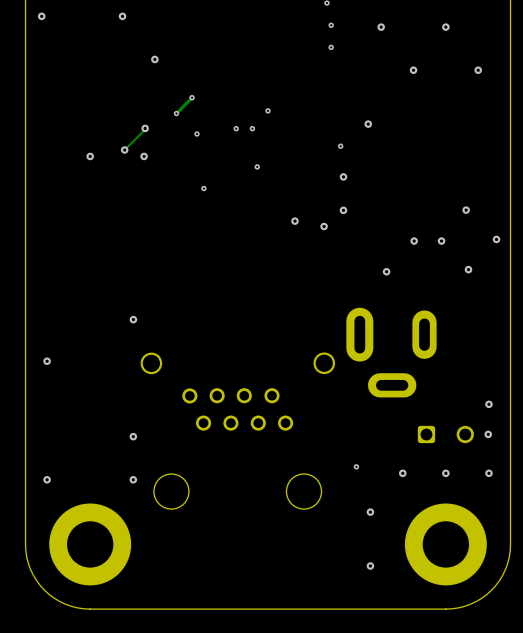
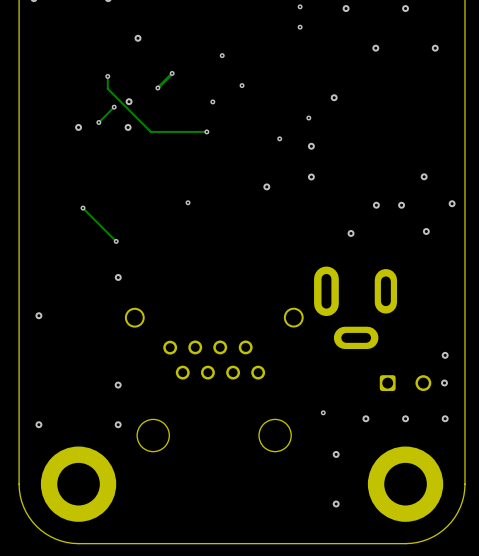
via: none -> (222, 55)
track: none -> (107, 76) (107, 88) (150, 131) (206, 131)
via: none -> (107, 76)
track: (145, 128) (124, 149) -> none
via: (252, 128) -> none
track: none -> (114, 107) (98, 122)
via: none -> (114, 107)
via: (196, 134) -> none
via: (124, 149) -> none
via: none -> (98, 122)
via: none -> (206, 131)
via: (257, 166) -> none
via: none -> (279, 138)
via: (203, 188) -> none
via: (324, 226) -> none
via: none -> (188, 202)
track: none -> (83, 208) (116, 241)
via: none -> (83, 208)
via: none -> (116, 241)

